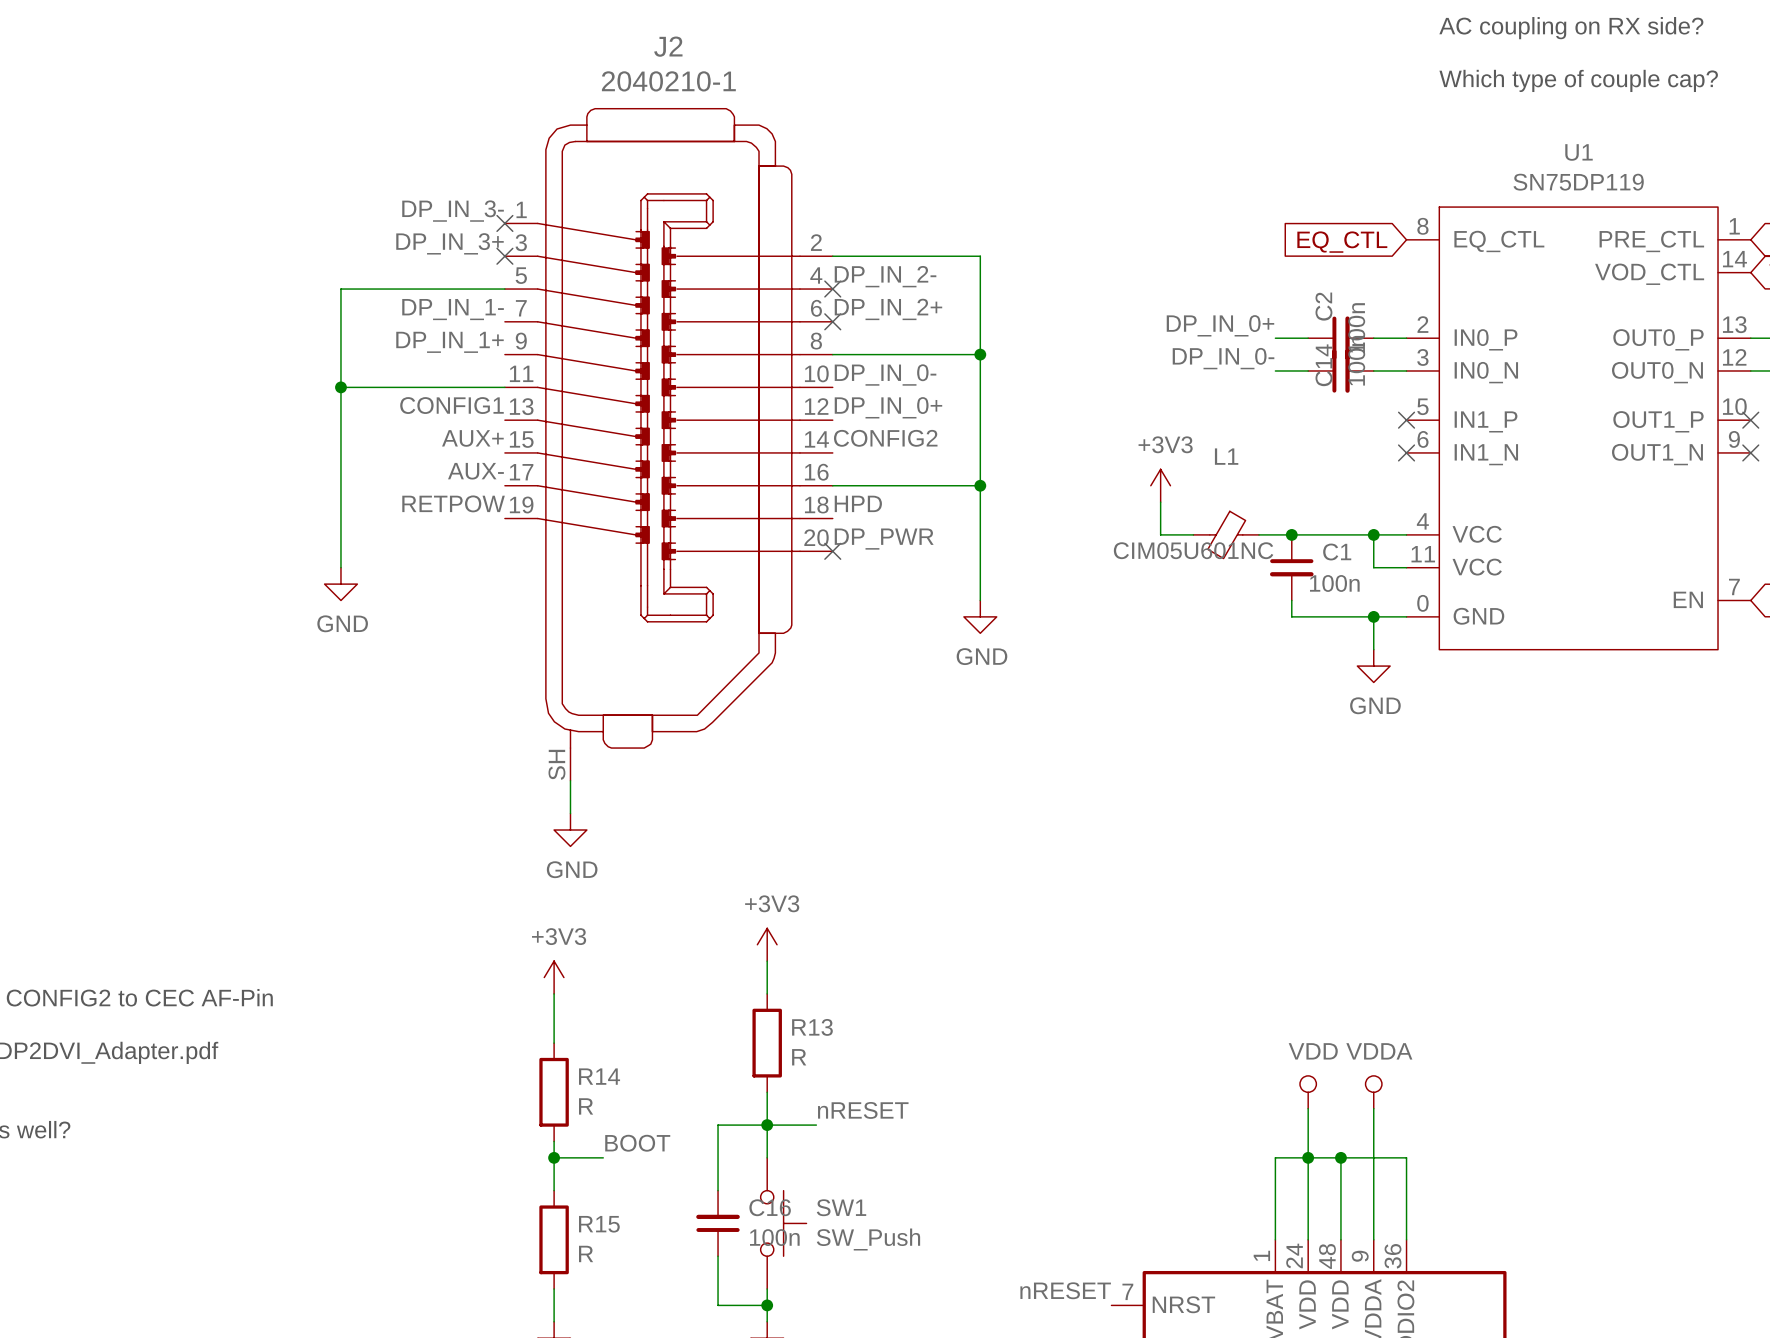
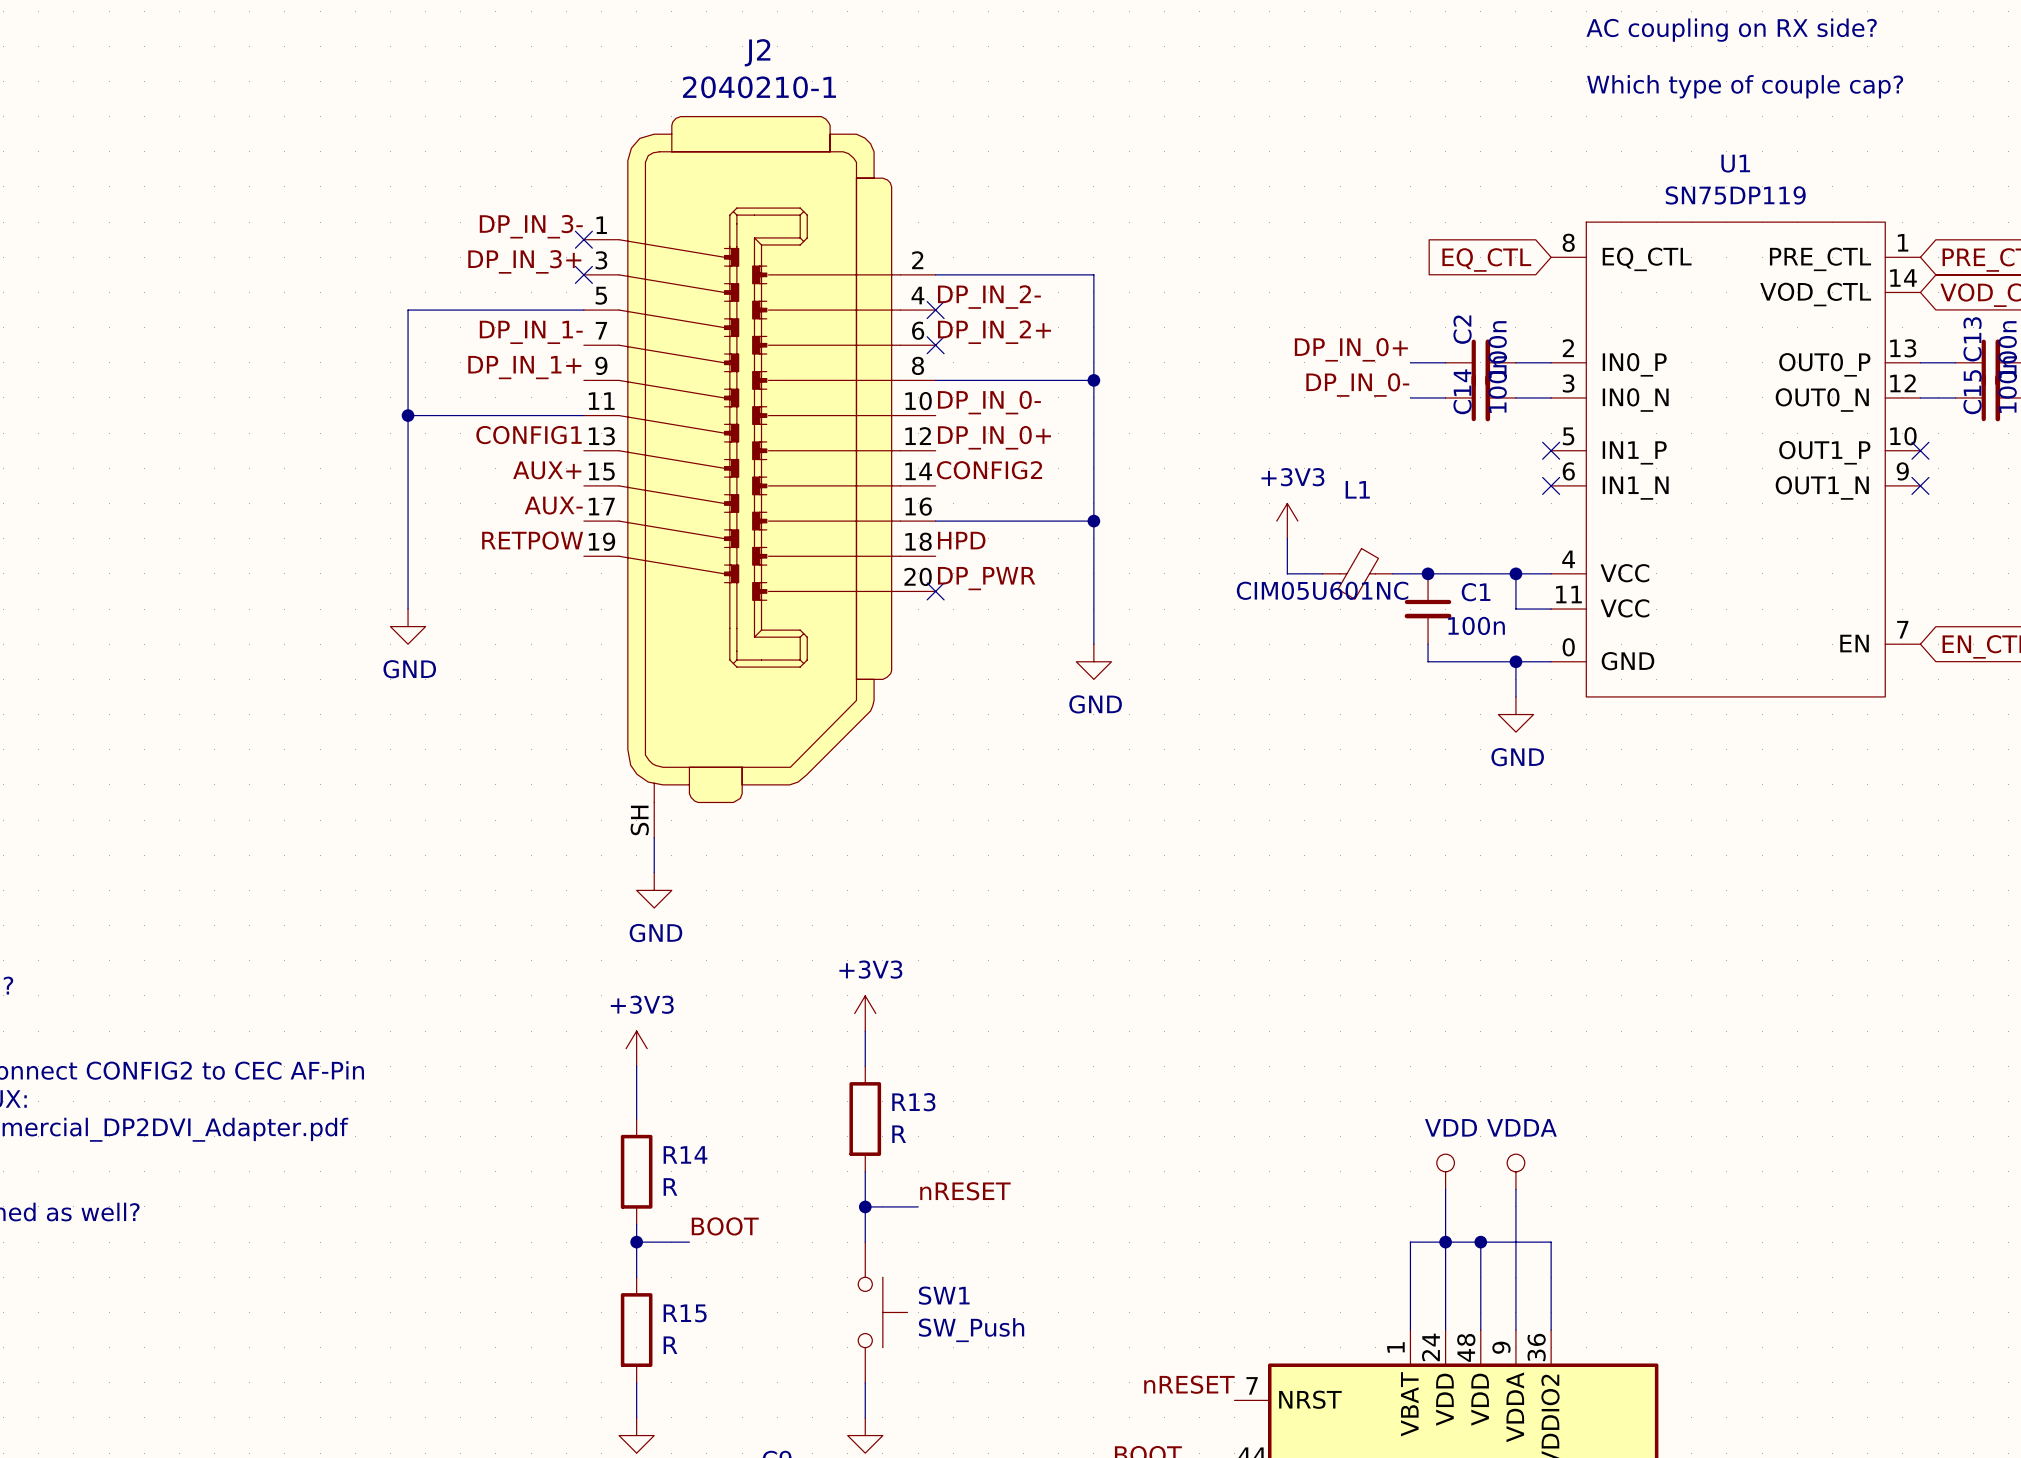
wire: (767, 1125) (718, 1125) (718, 1190) -> none
C16: 100n (718, 1223) -> none
wire: (718, 1256) (718, 1305) (767, 1305) -> none
junction: (767, 1305) -> none

